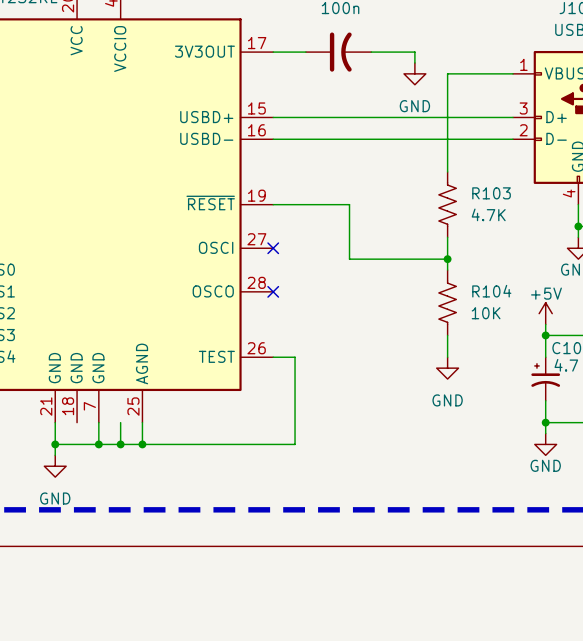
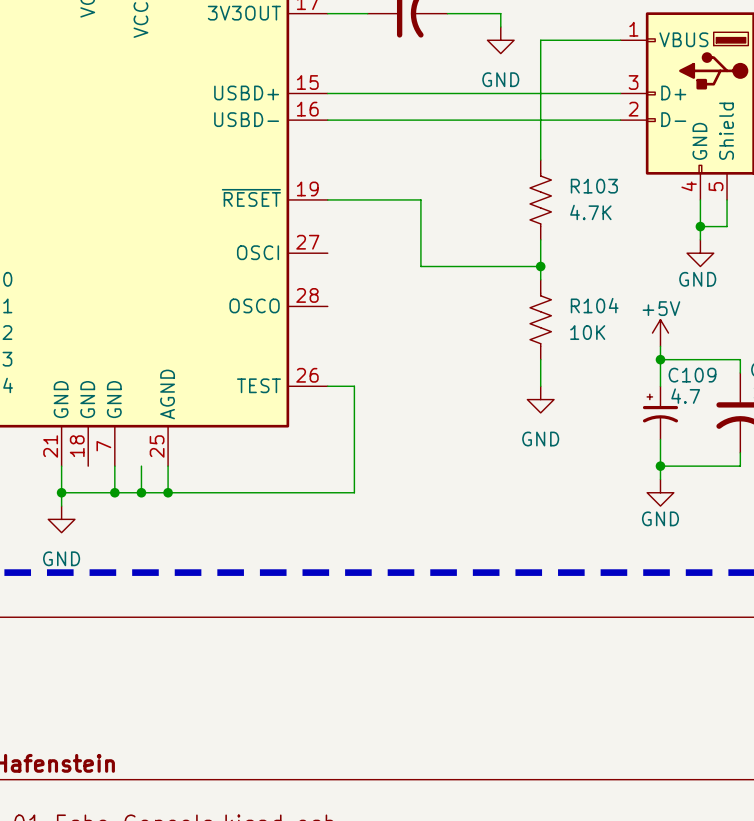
no-connect mark: (273, 248) -> none
no-connect mark: (273, 291) -> none

